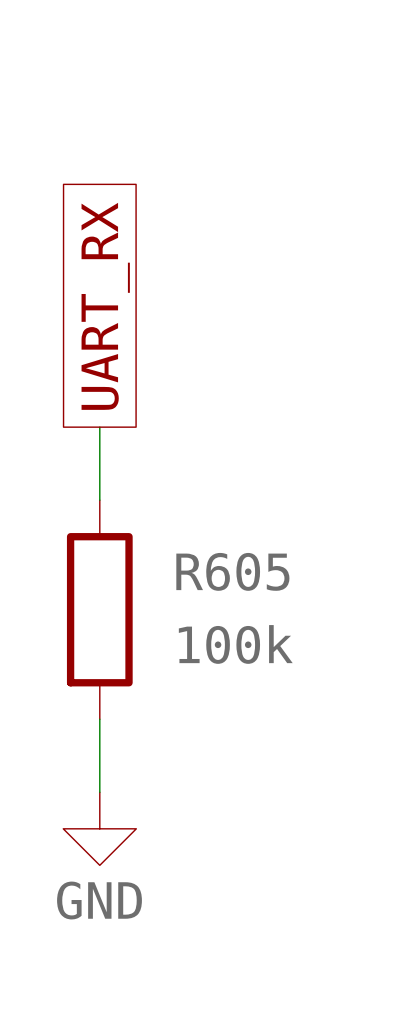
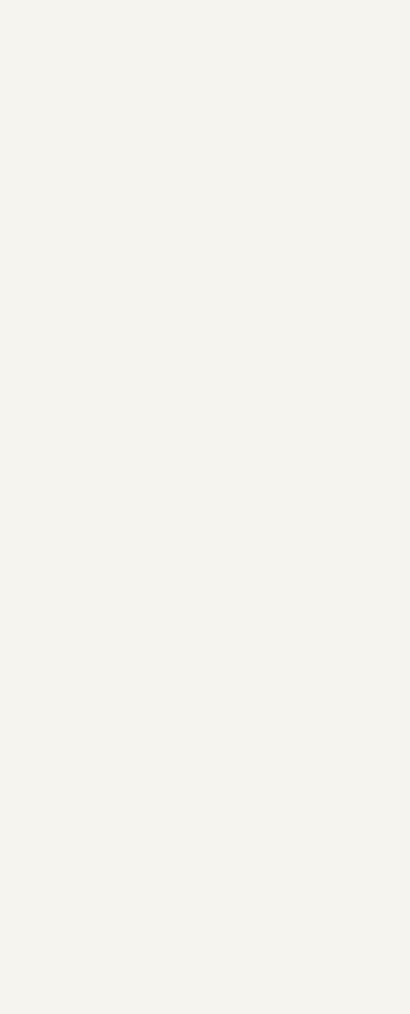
global label: UART_RX (105, 306) -> none
wire: (99, 427) (99, 500) -> none
R605: 100k (99, 609) -> none
wire: (99, 719) (99, 792) -> none
power symbol: GND (99, 828) -> none

